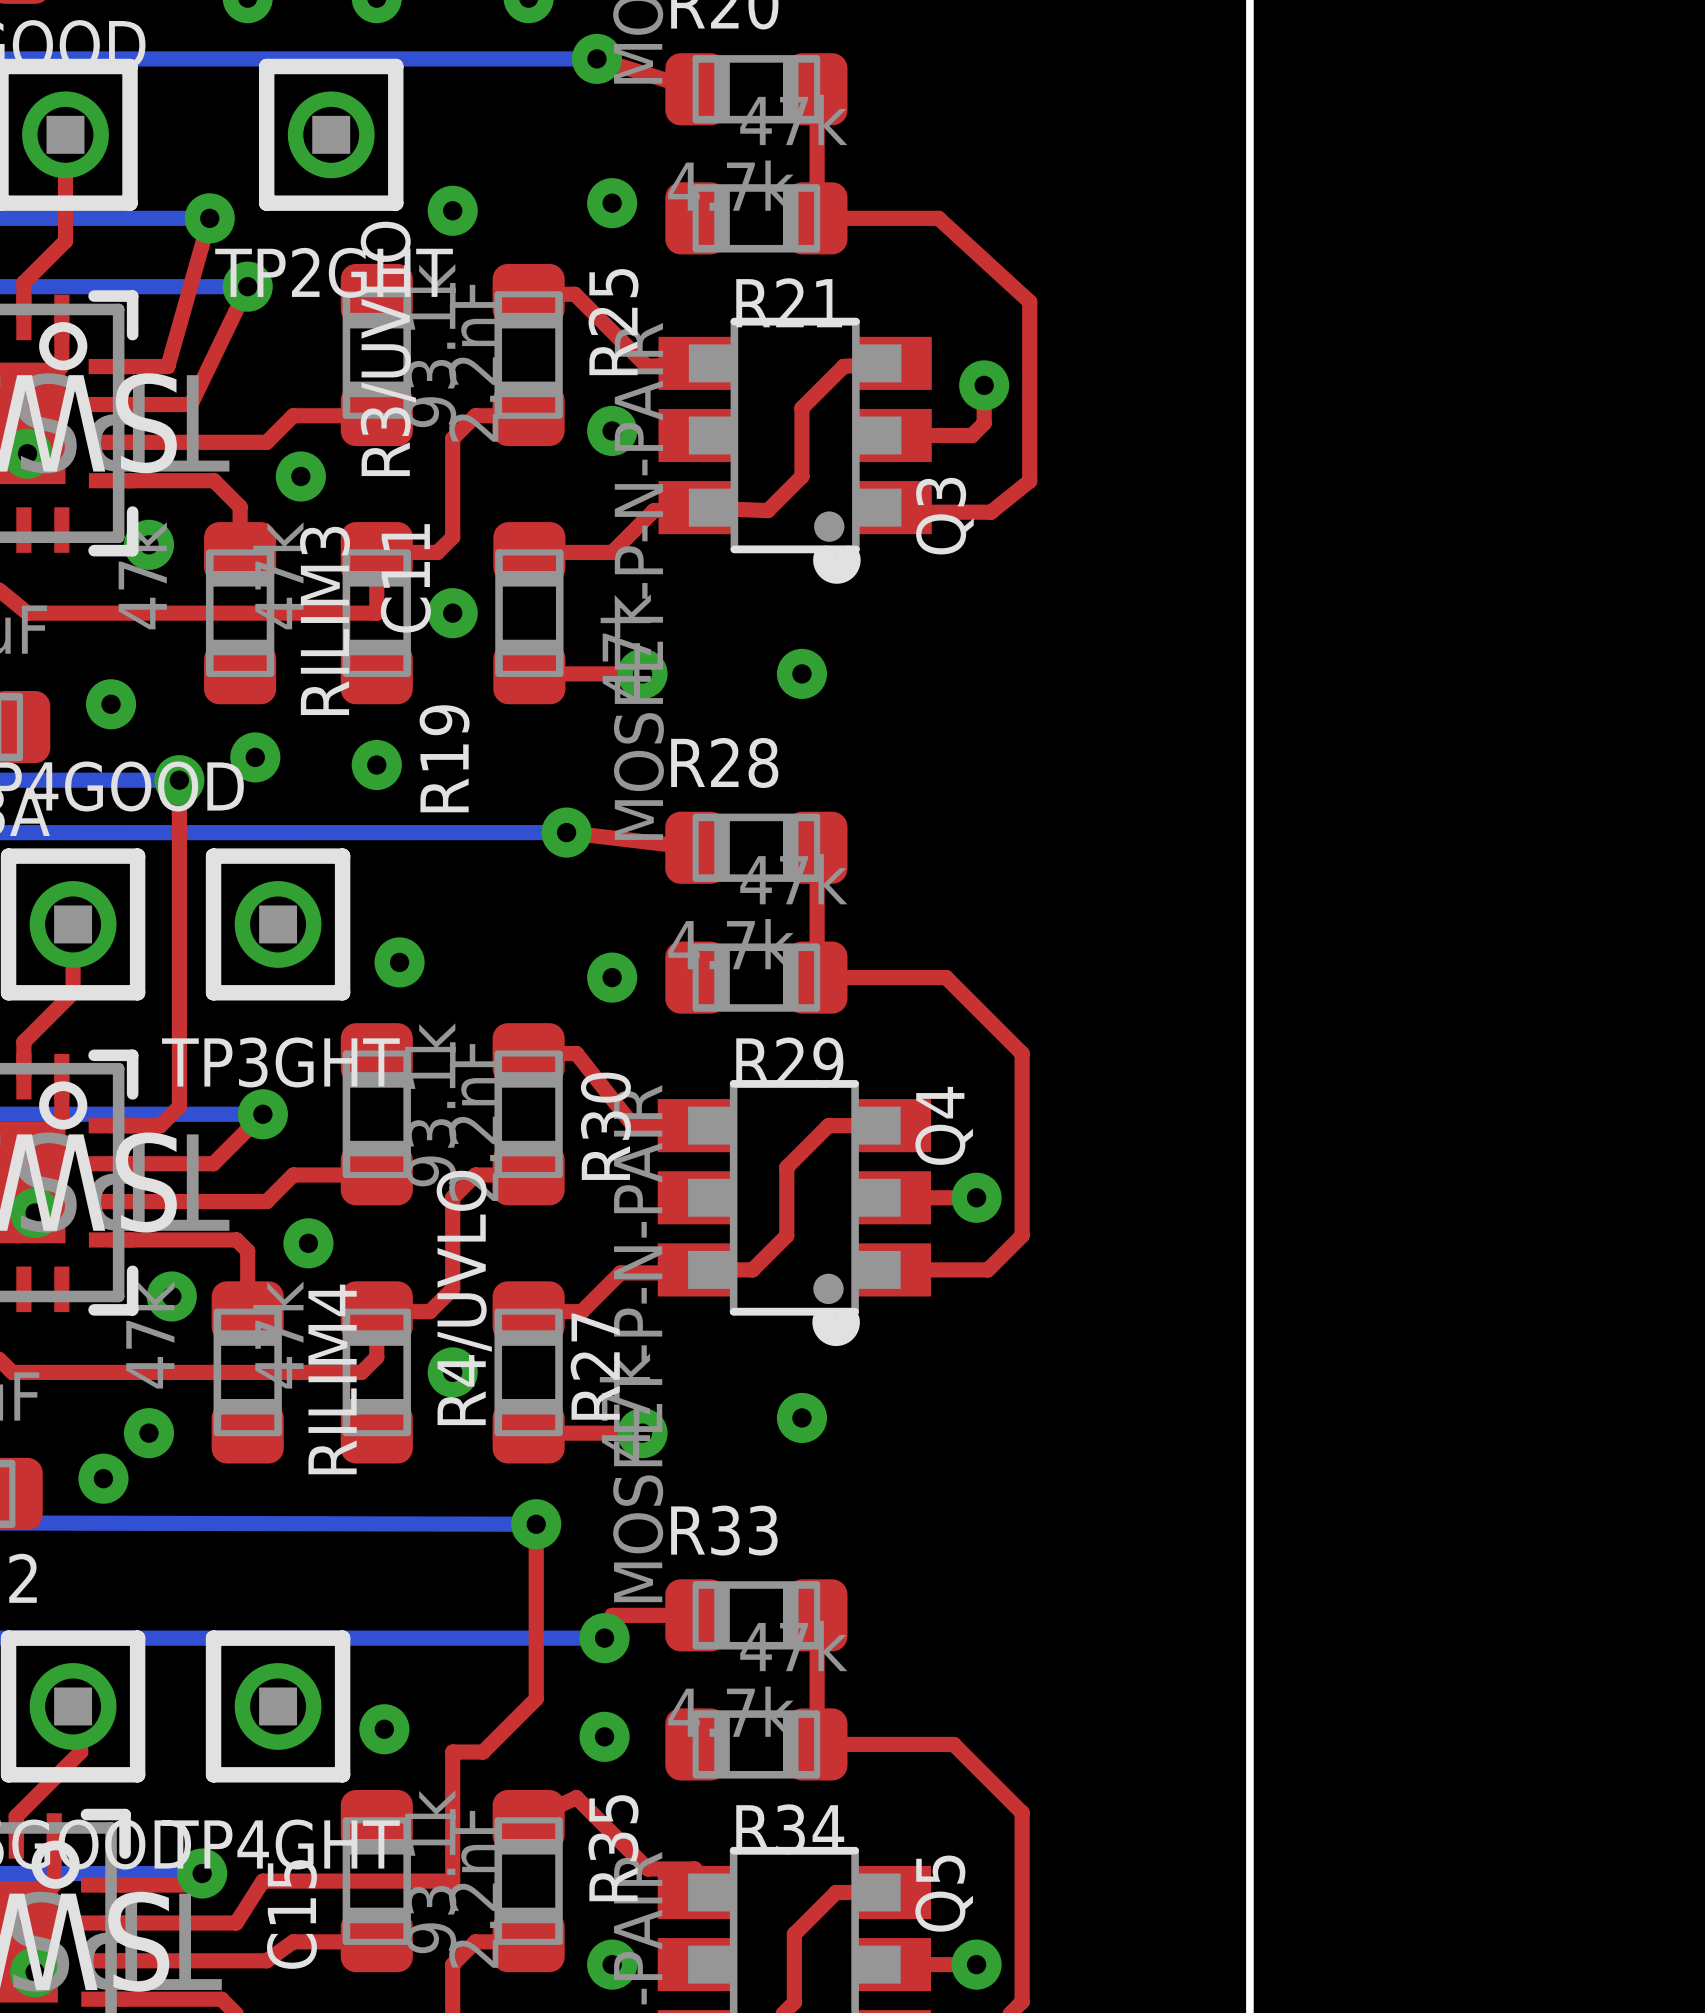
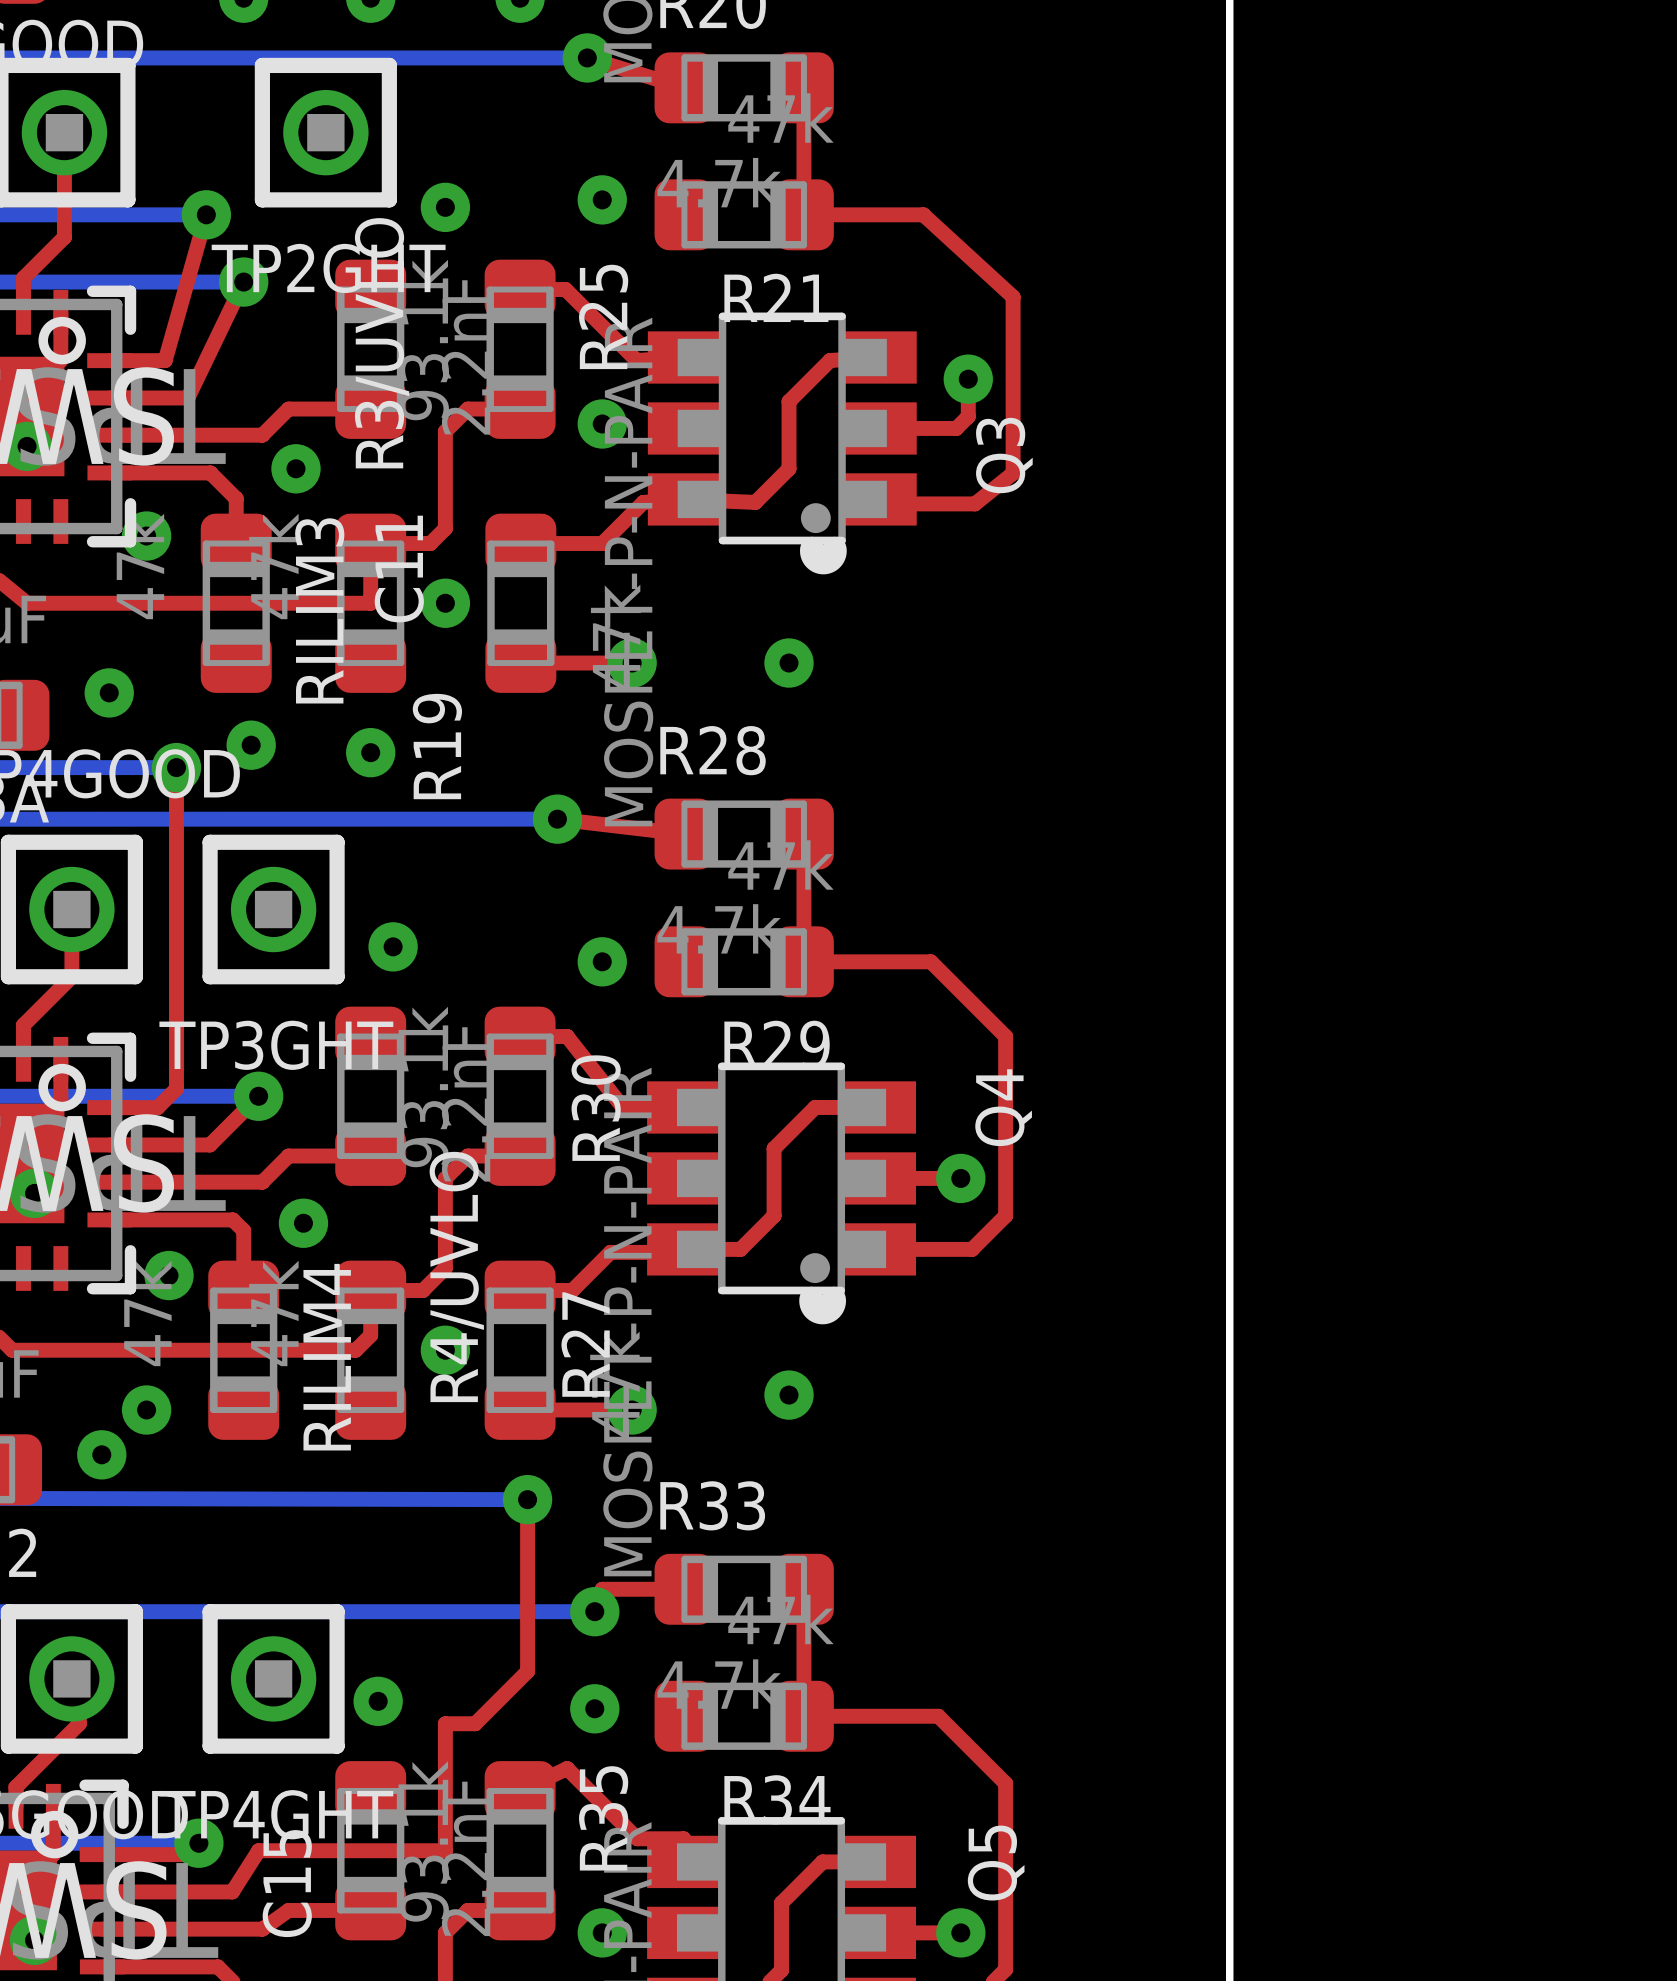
Q3 name position: Q3 (944, 516) -> Q3 (1004, 455)
Q4 name position: Q4 (944, 1125) -> Q4 (1003, 1107)
Q5 name position: Q5 (944, 1893) -> Q5 (996, 1863)

